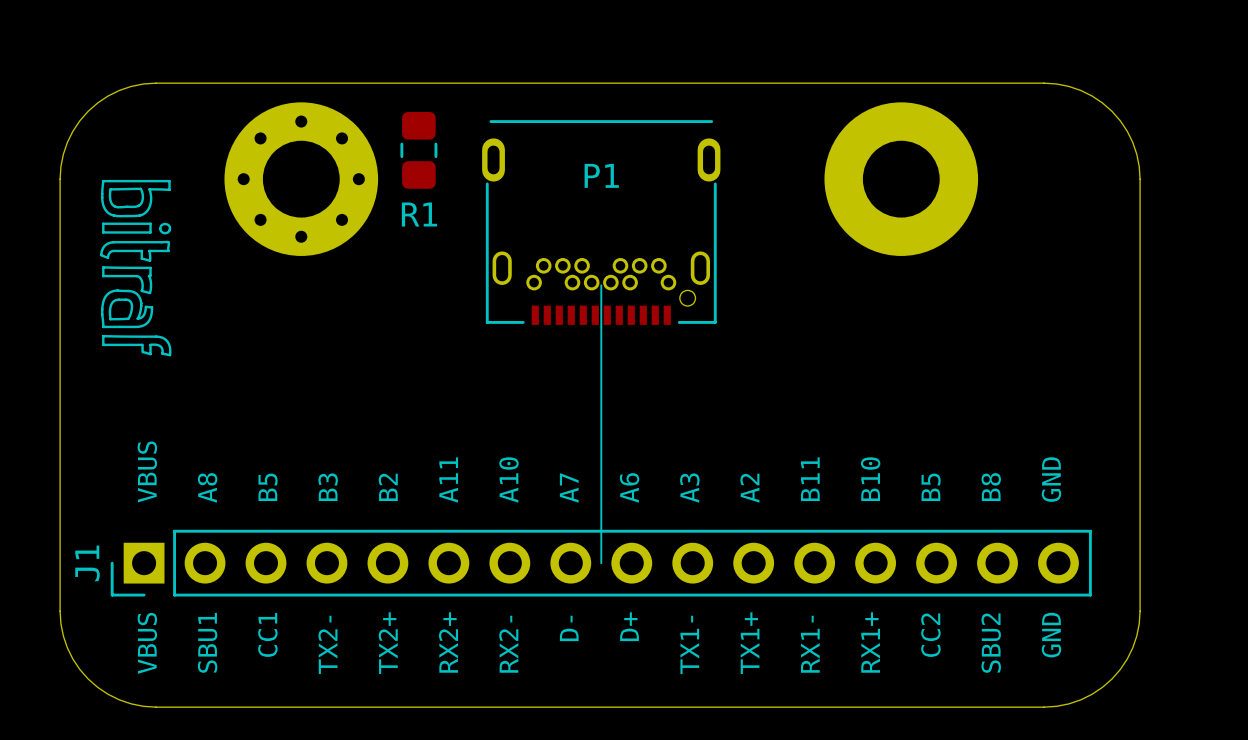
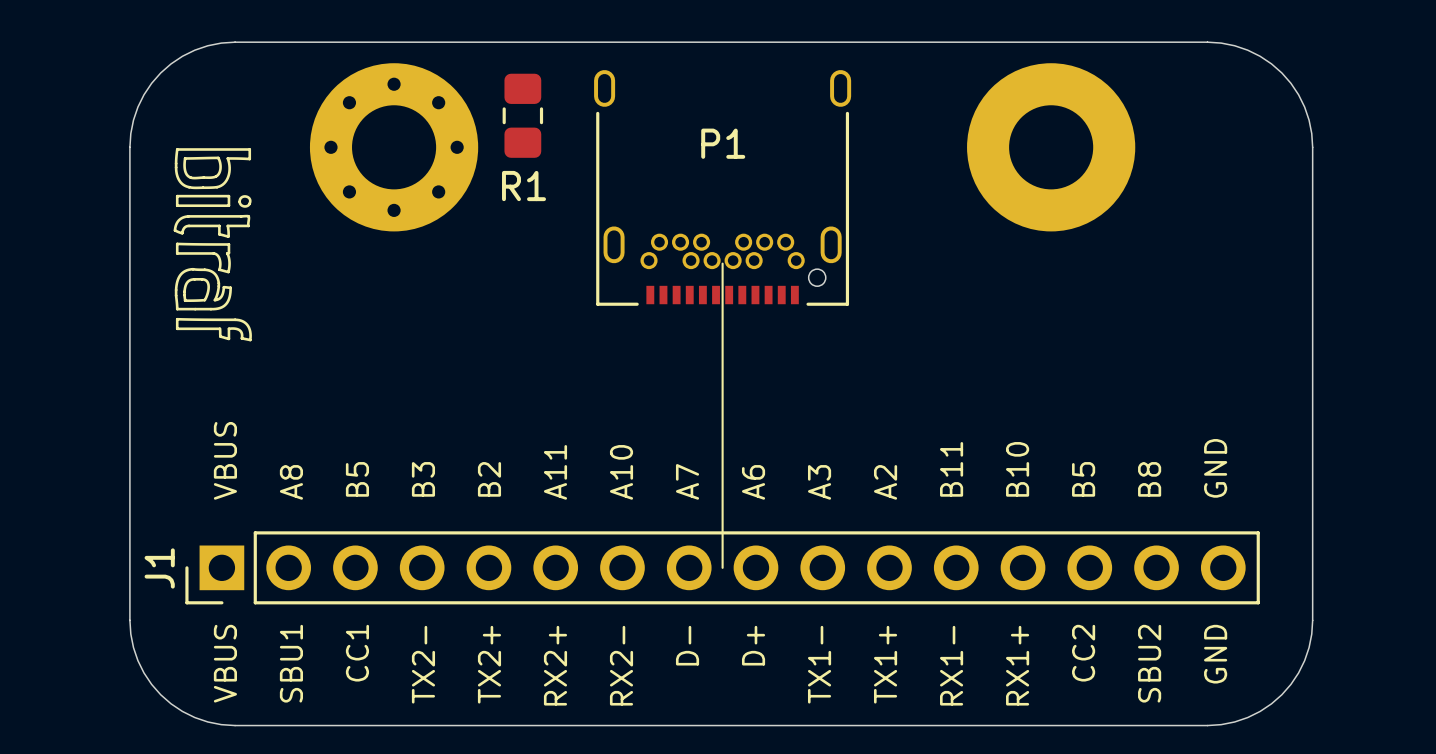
P1 footprint: [482, 120, 721, 325] -> [594, 70, 852, 306]

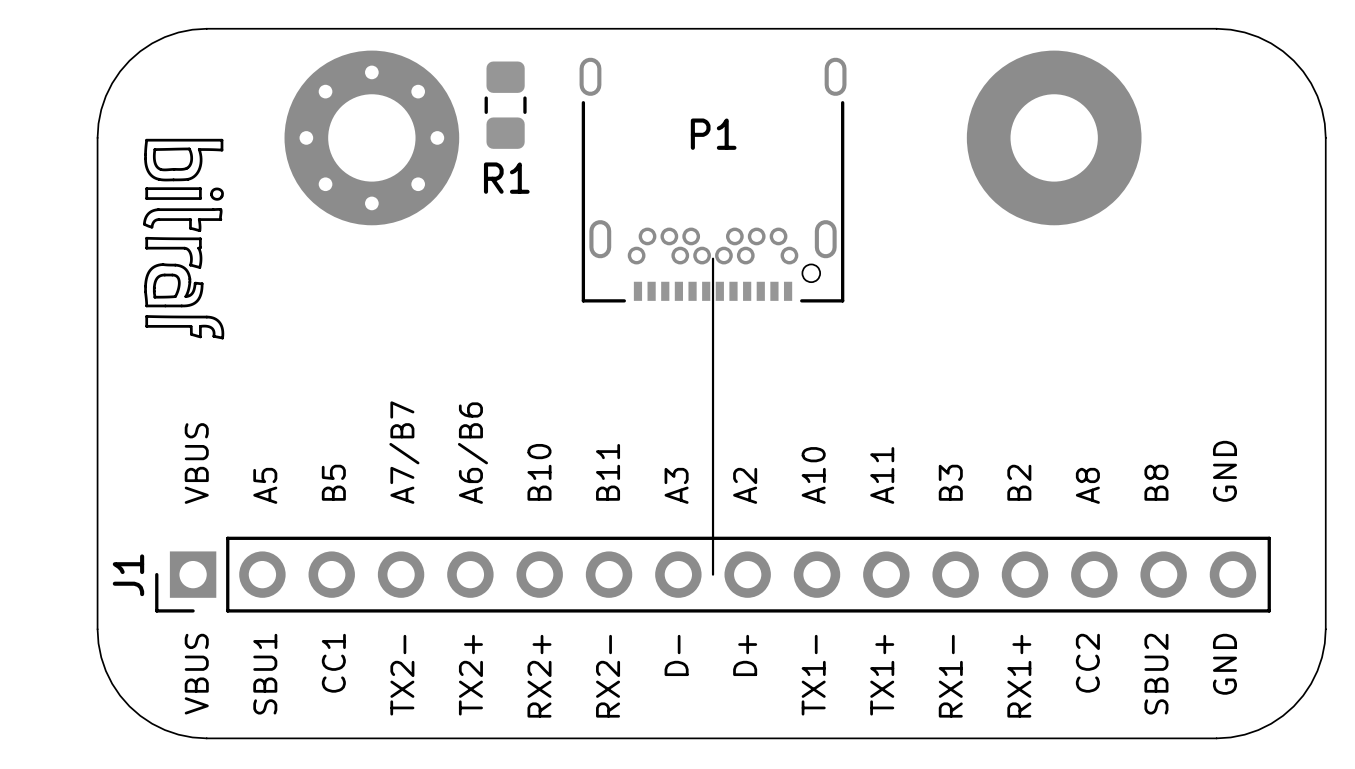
text: B11 (951, 469) -> B3 (950, 482)
text: B10 (1017, 469) -> B2 (1019, 482)
text: A11 (555, 472) -> B10 (539, 472)
text: A10 (621, 472) -> B11 (608, 472)
text: B3 (423, 479) -> A7/B7 (404, 452)
text: B2 (489, 479) -> A6/B6 (472, 453)
text: B5 (1083, 479) -> A8 (1087, 485)
text: A7 (687, 481) -> A3 (676, 485)
text: A8 (291, 482) -> A5 (265, 485)
text: A6 (753, 482) -> A2 (745, 485)
text: A3 (819, 482) -> A10 (813, 475)
text: A2 (885, 482) -> A11 (882, 475)

